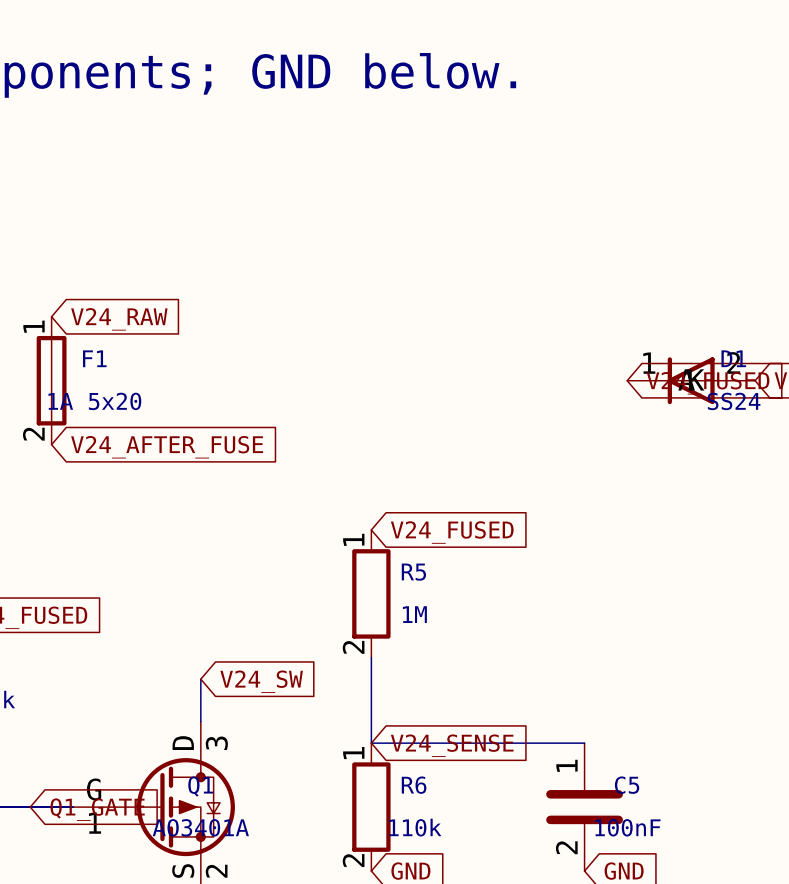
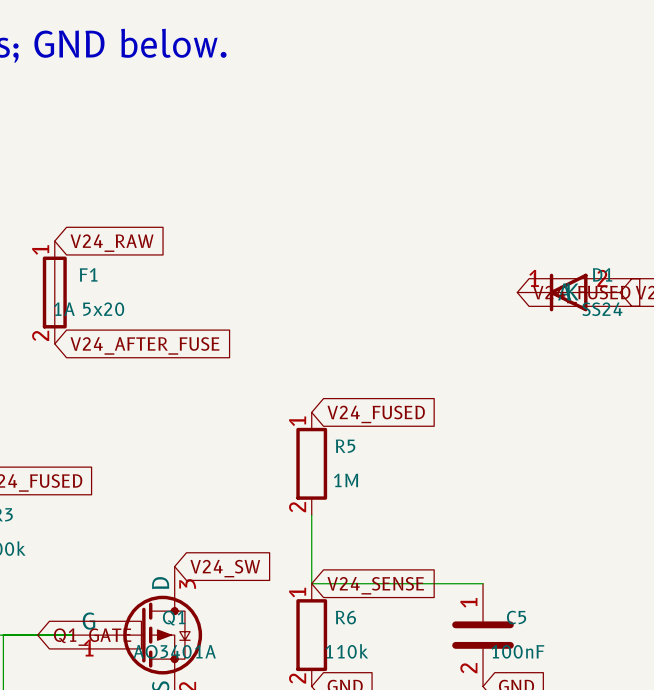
wire: (200, 679) (200, 721) -> none
global label position: V24_SW (261, 681) -> V24_SW (225, 568)

